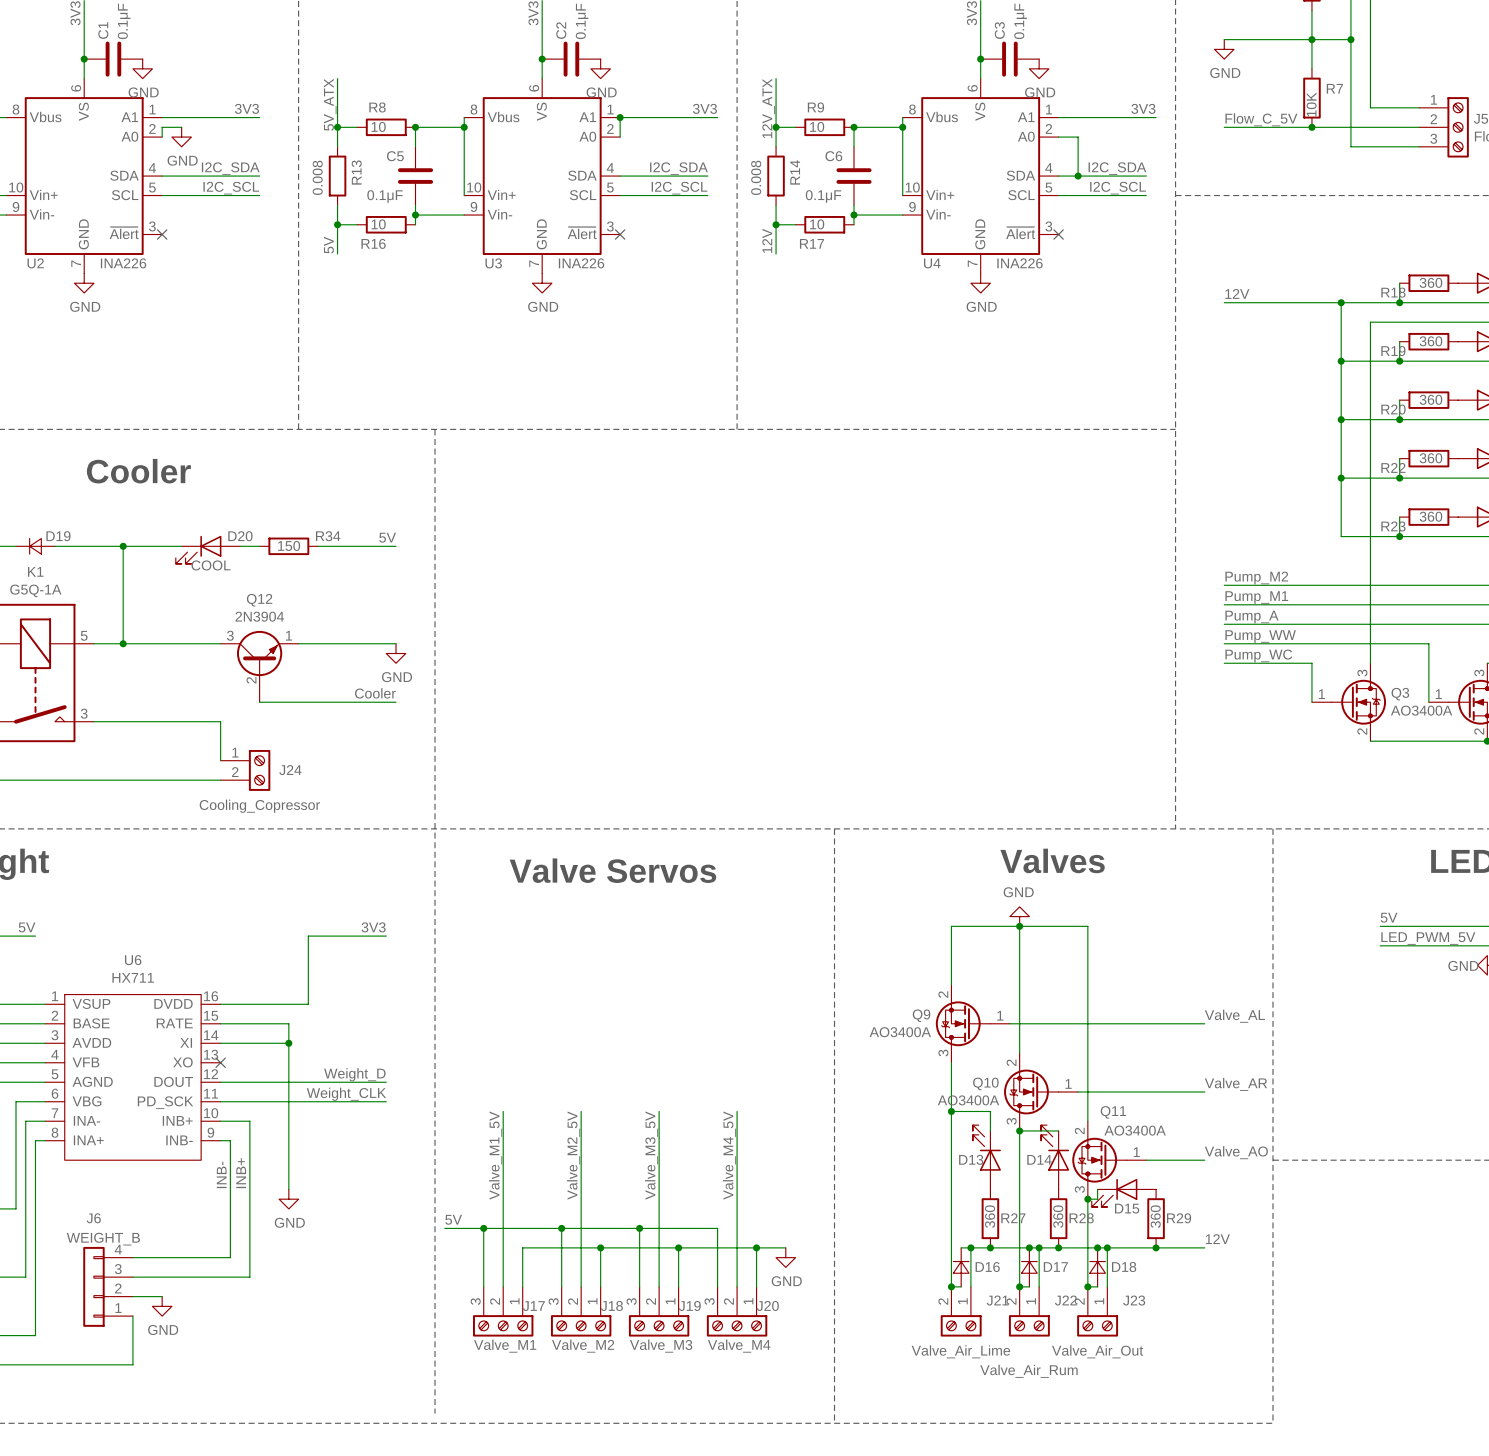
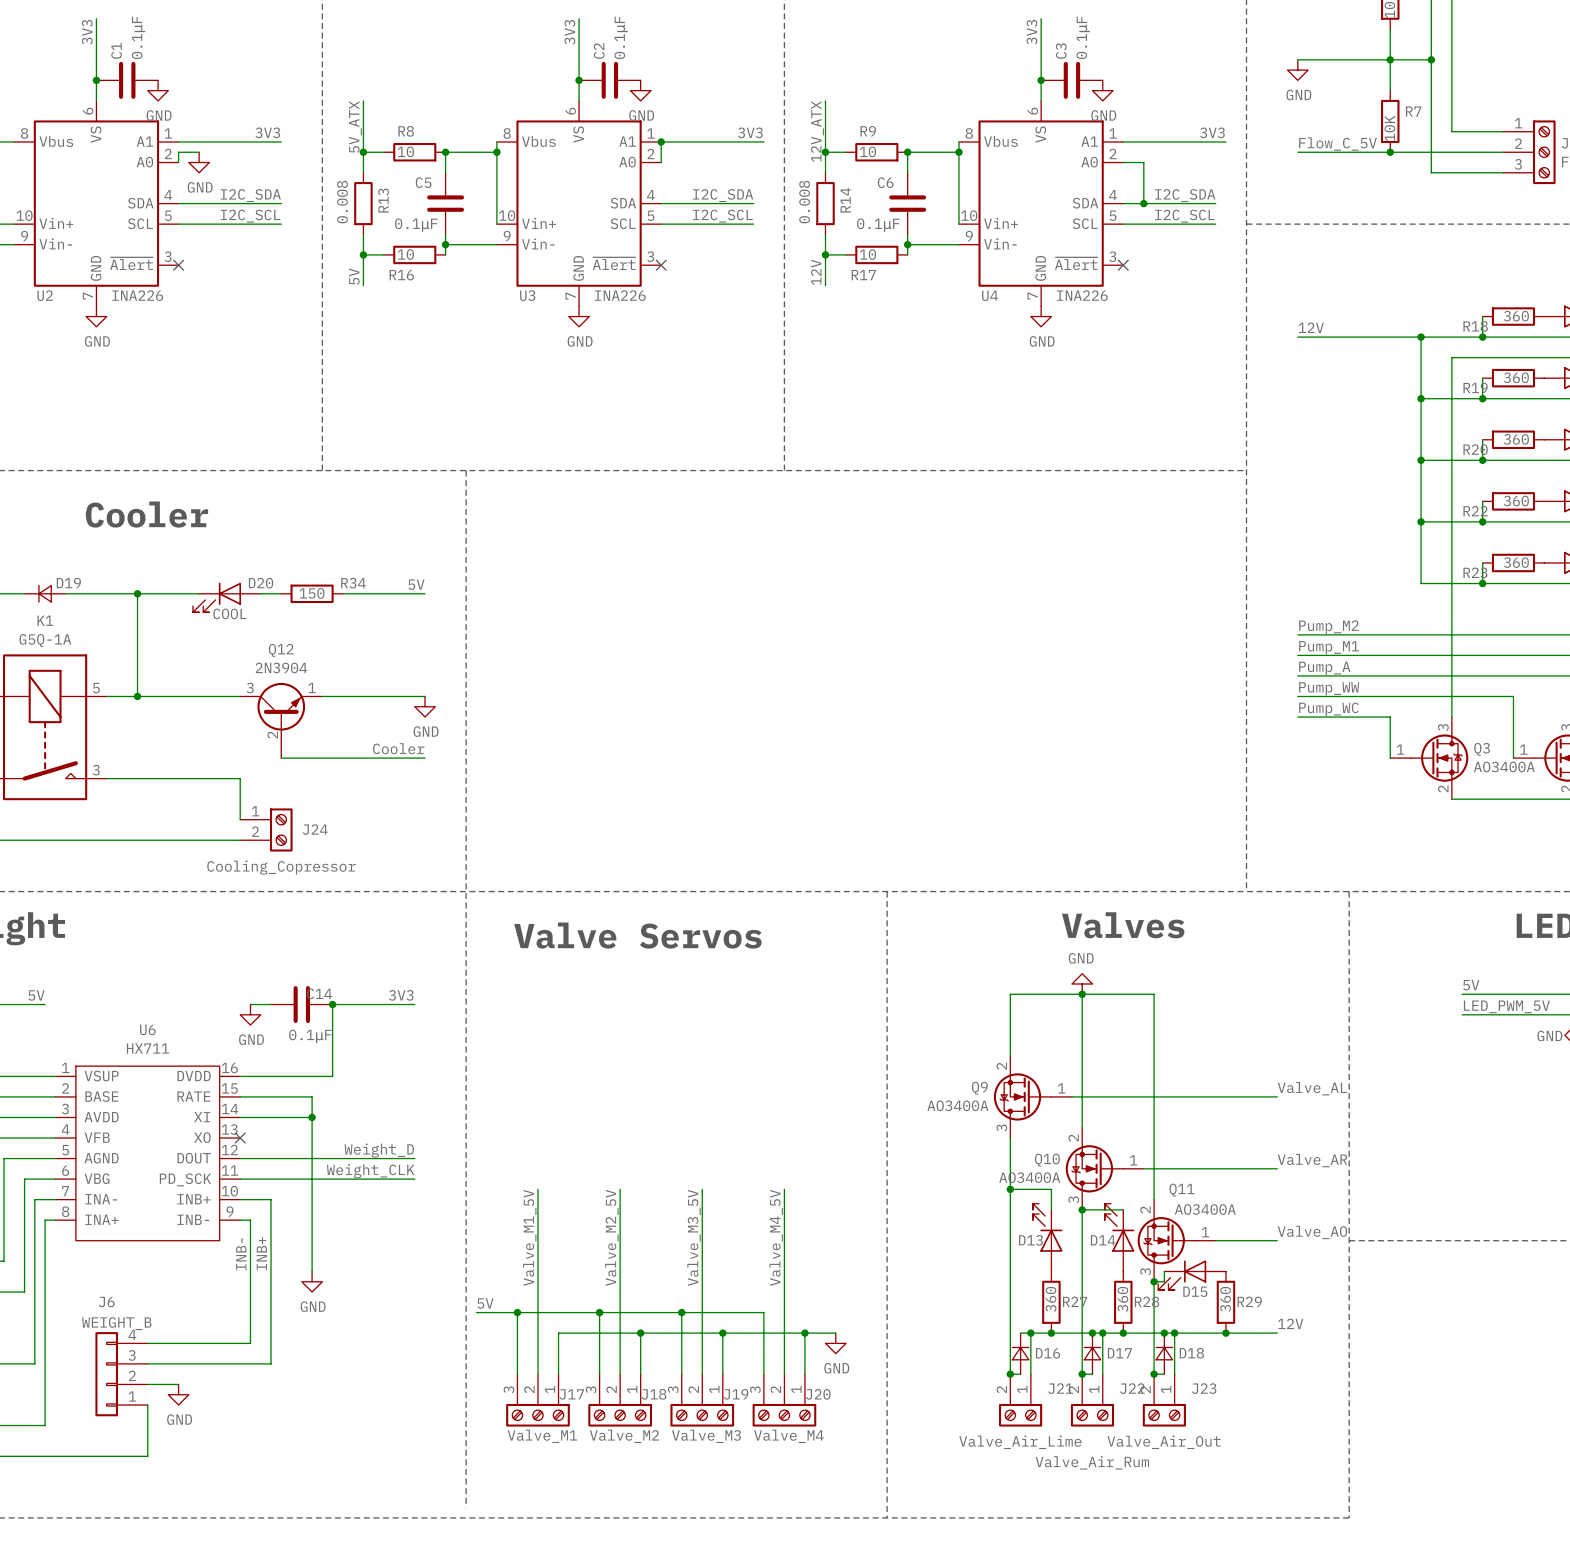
wire: none -> (250, 1004) (271, 1004)
C14: none -> 0.1μF (301, 1004)
junction: none -> (332, 1004)
power symbol: none -> GND (250, 1014)

